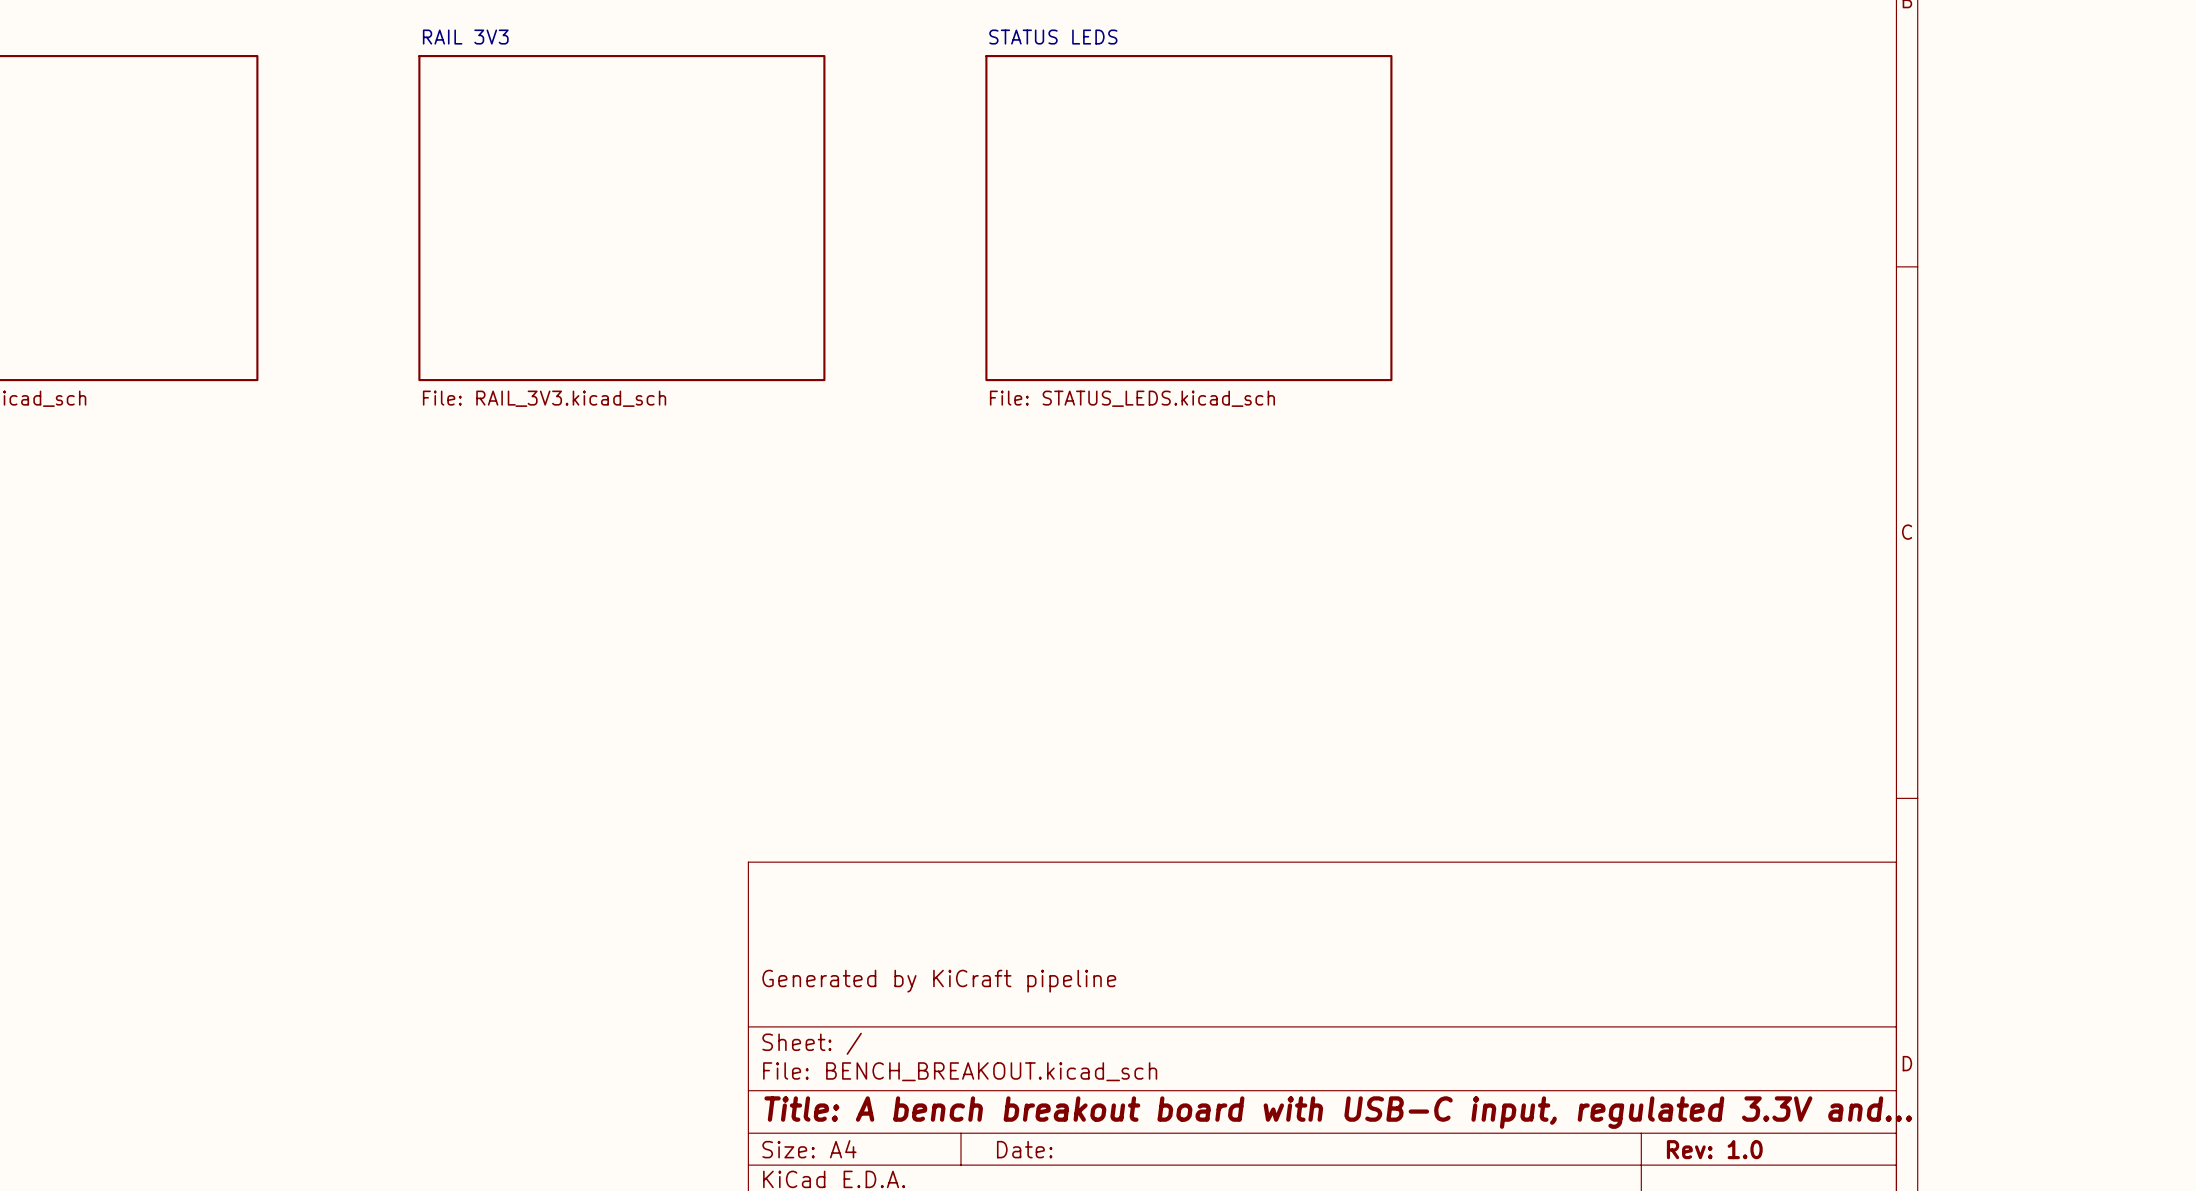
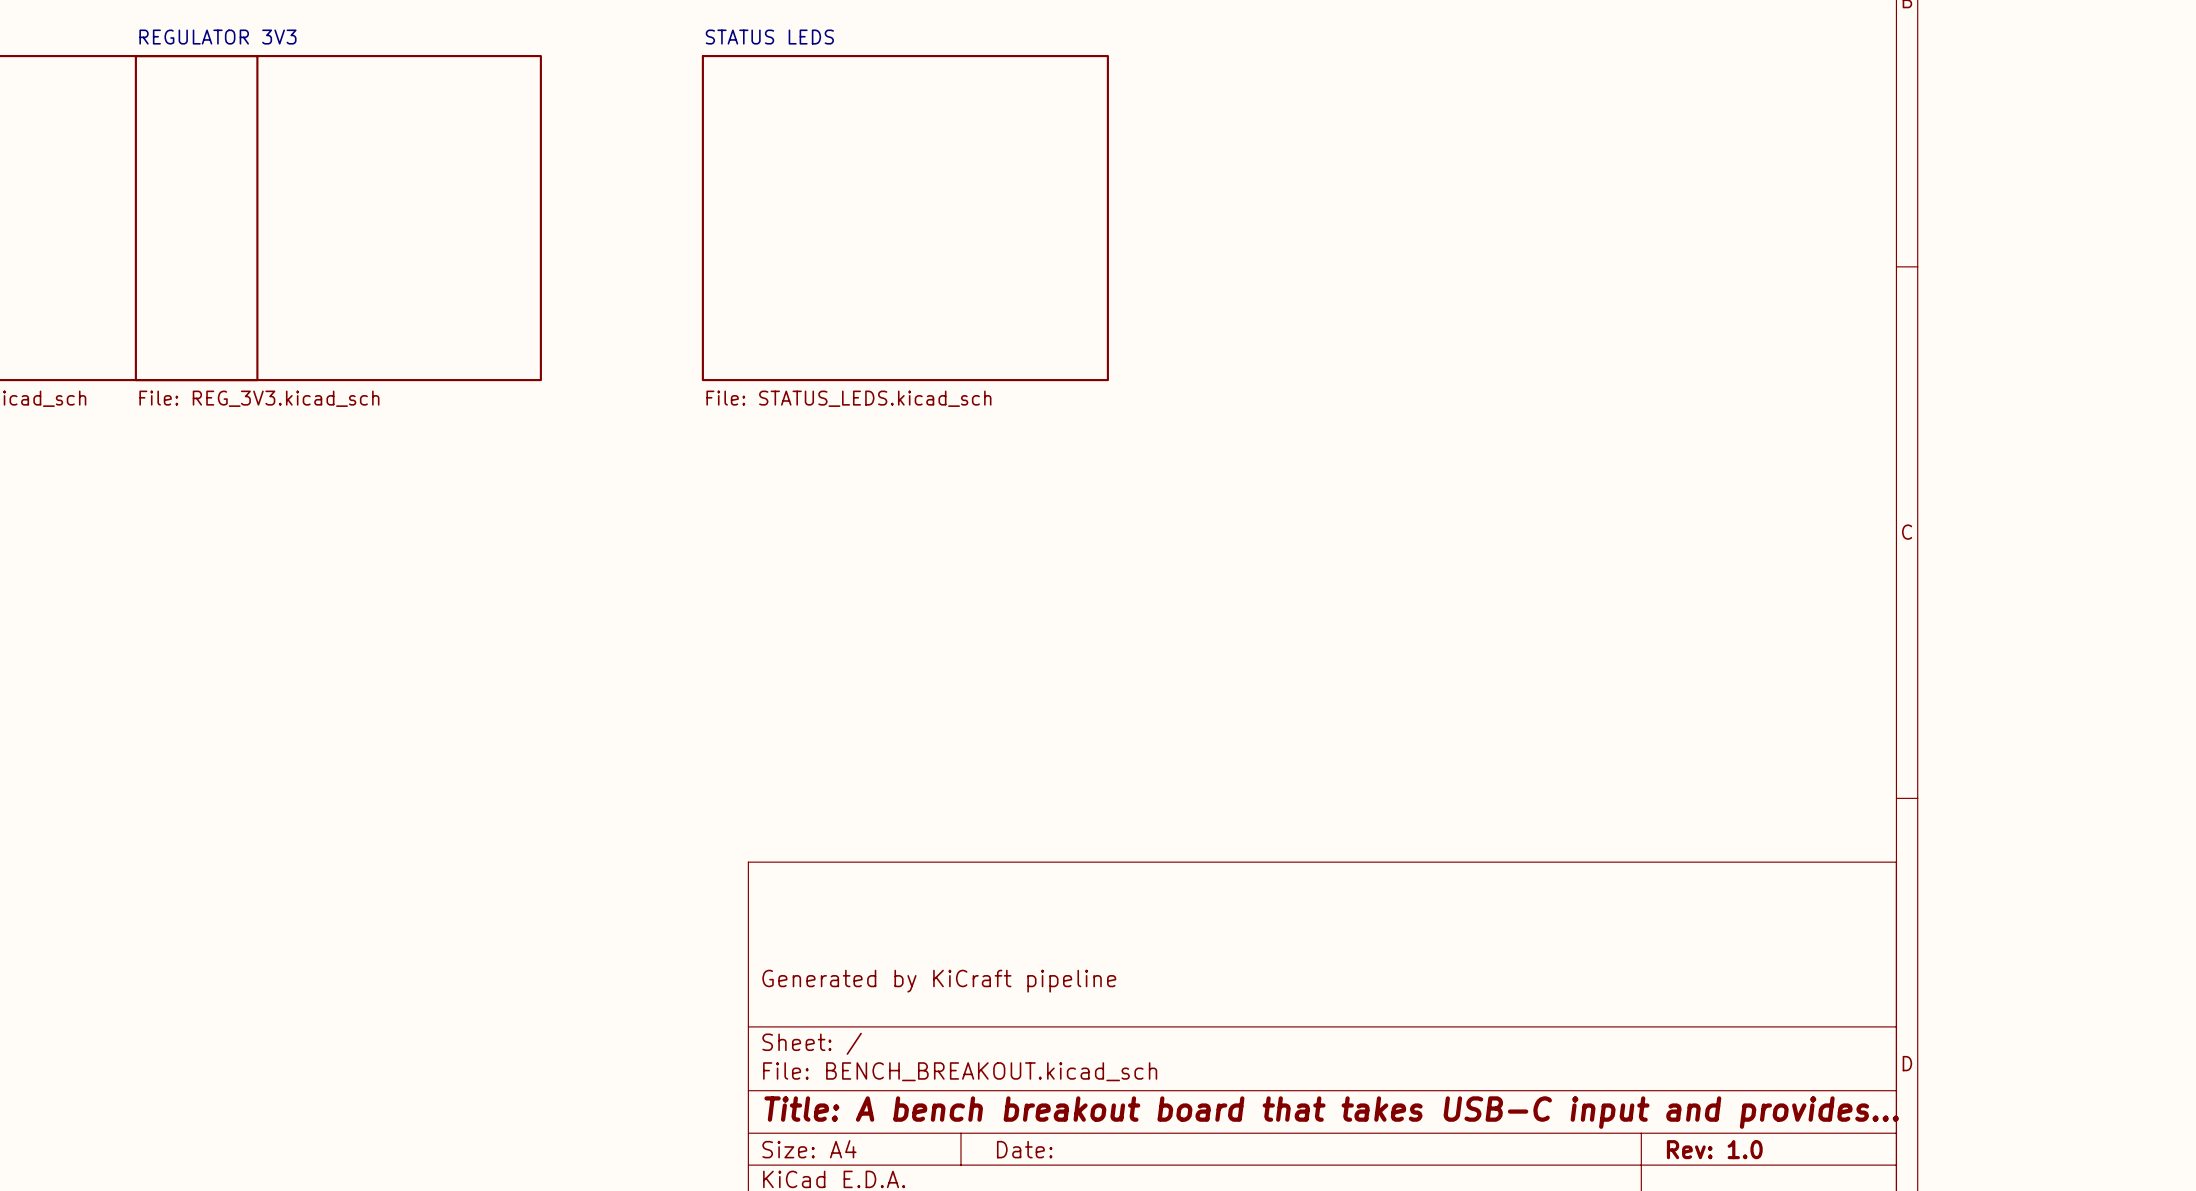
sheet REGULATOR 3V3: none -> File: REG_3V3.kicad_sch (338, 218)
sheet RAIL 3V3: File: RAIL_3V3.kicad_sch (621, 218) -> none
sheet STATUS LEDS: none -> File: STATUS_LEDS.kicad_sch (905, 218)
sheet STATUS LEDS: File: STATUS_LEDS.kicad_sch (1188, 218) -> none
title block: Title: A bench breakout board with USB-C input, regulated 3.3V and… (1338, 1112) -> Title: A bench breakout board that takes USB-C input and provides… (1331, 1112)

